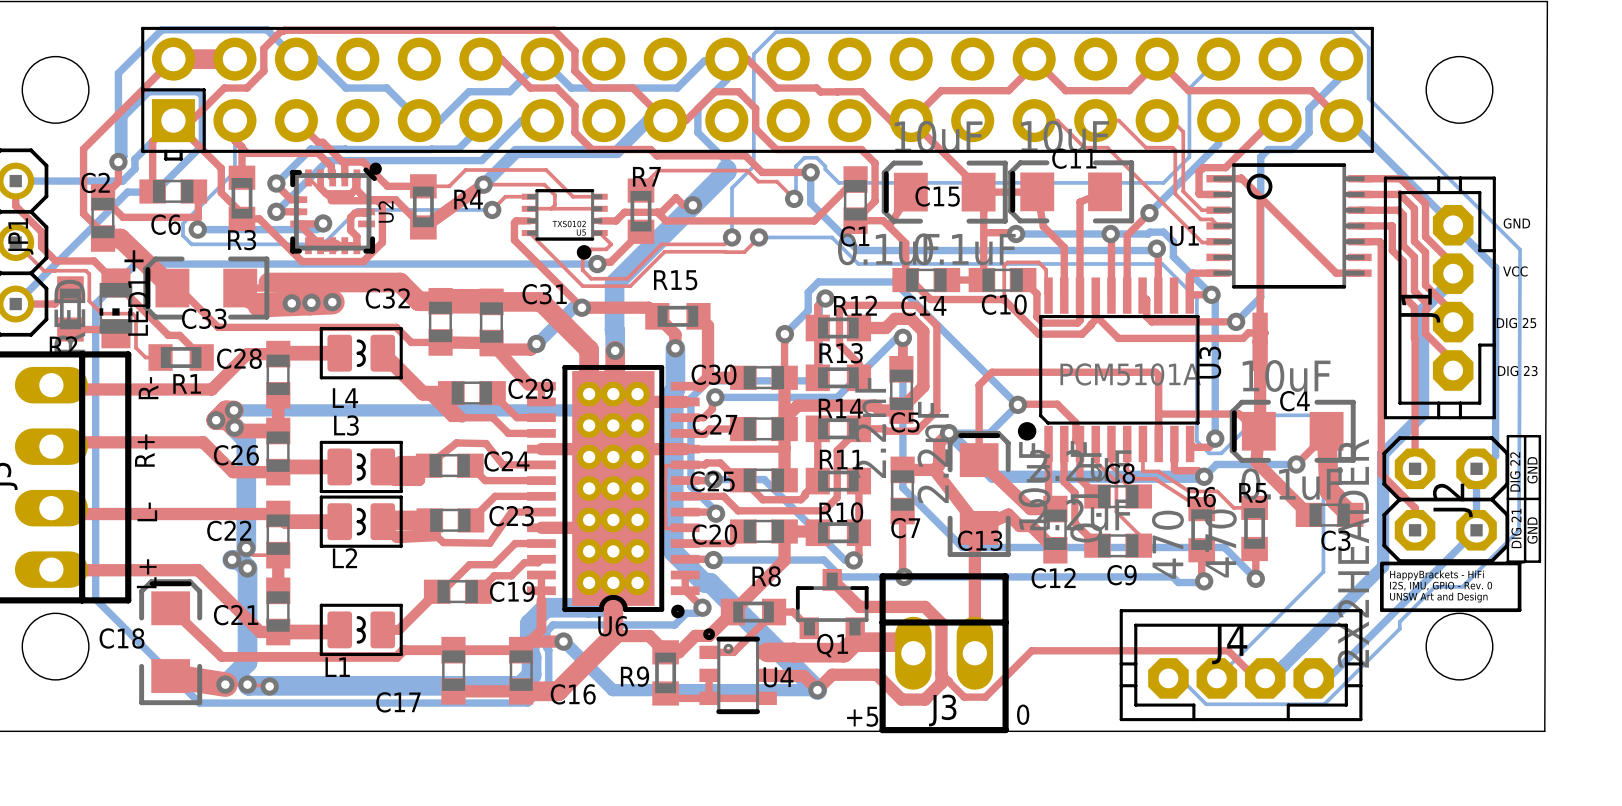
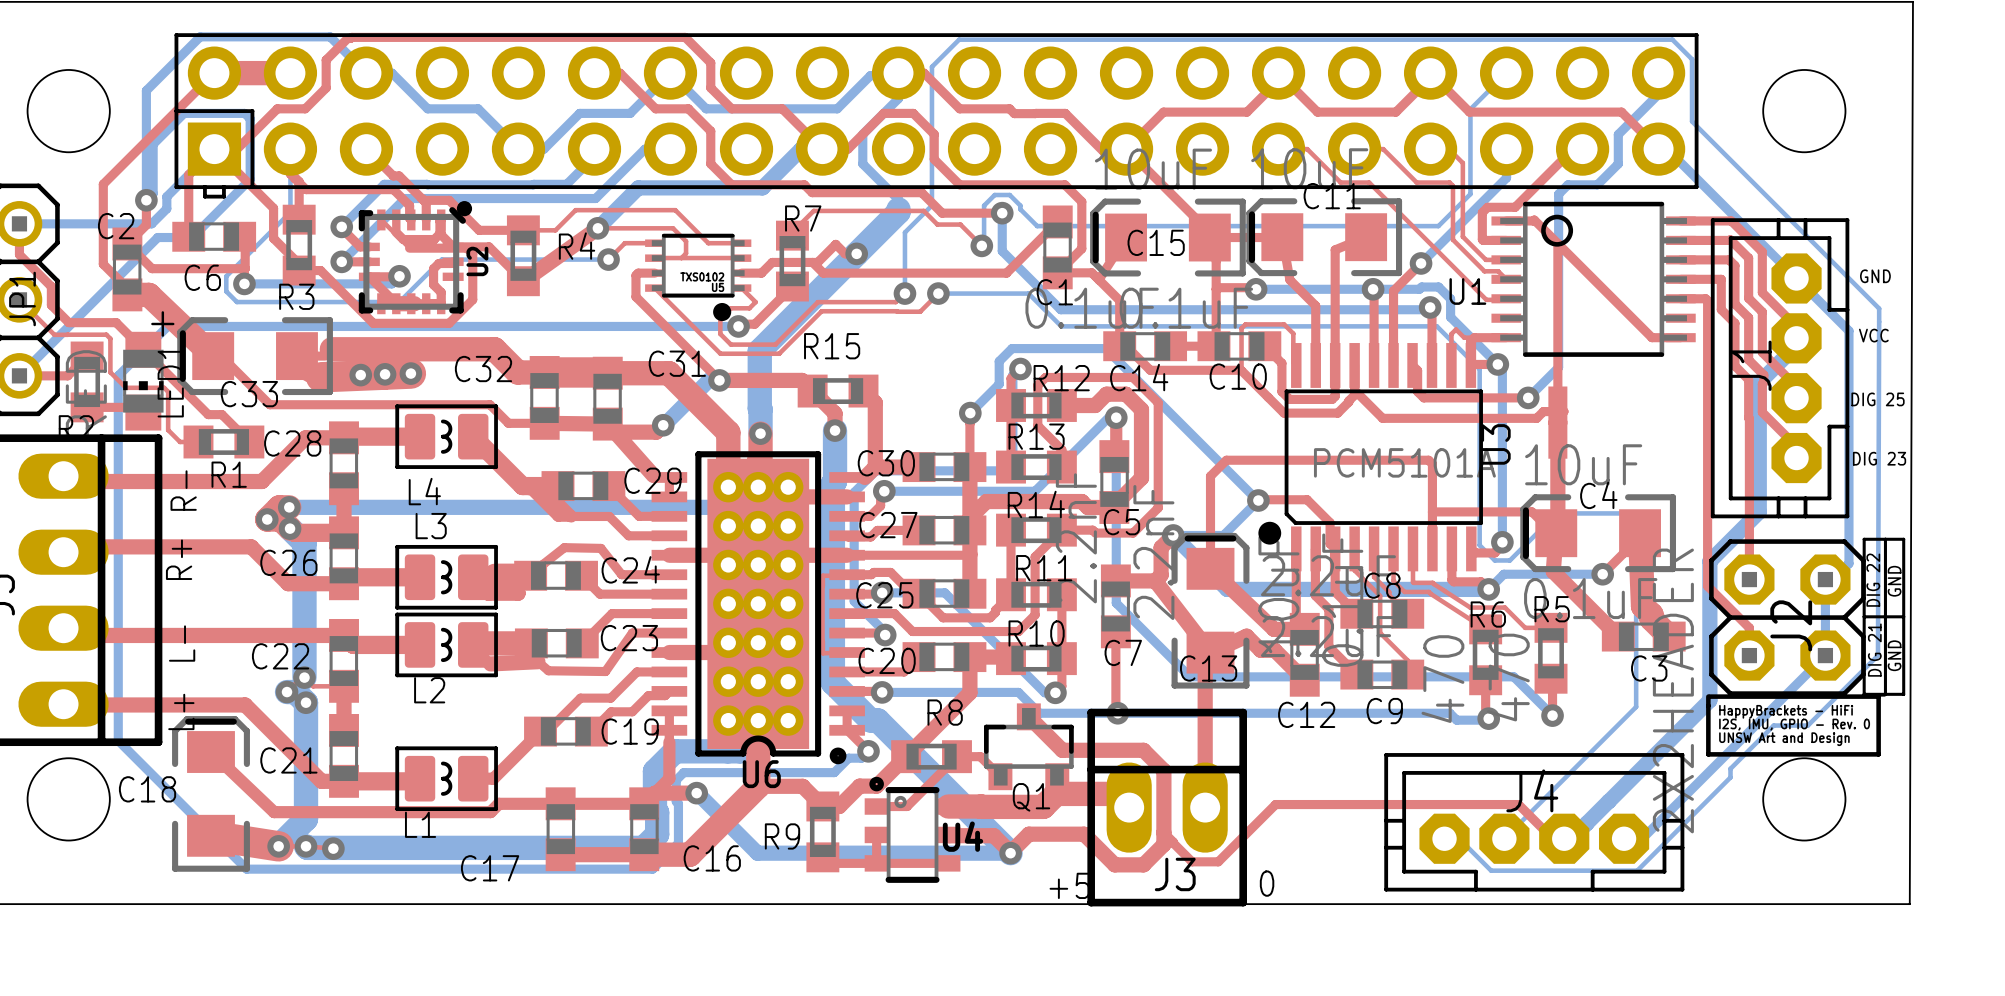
top track: none -> (1474, 337) (1464, 337) (1456, 329) (1451, 334) (1451, 365)

